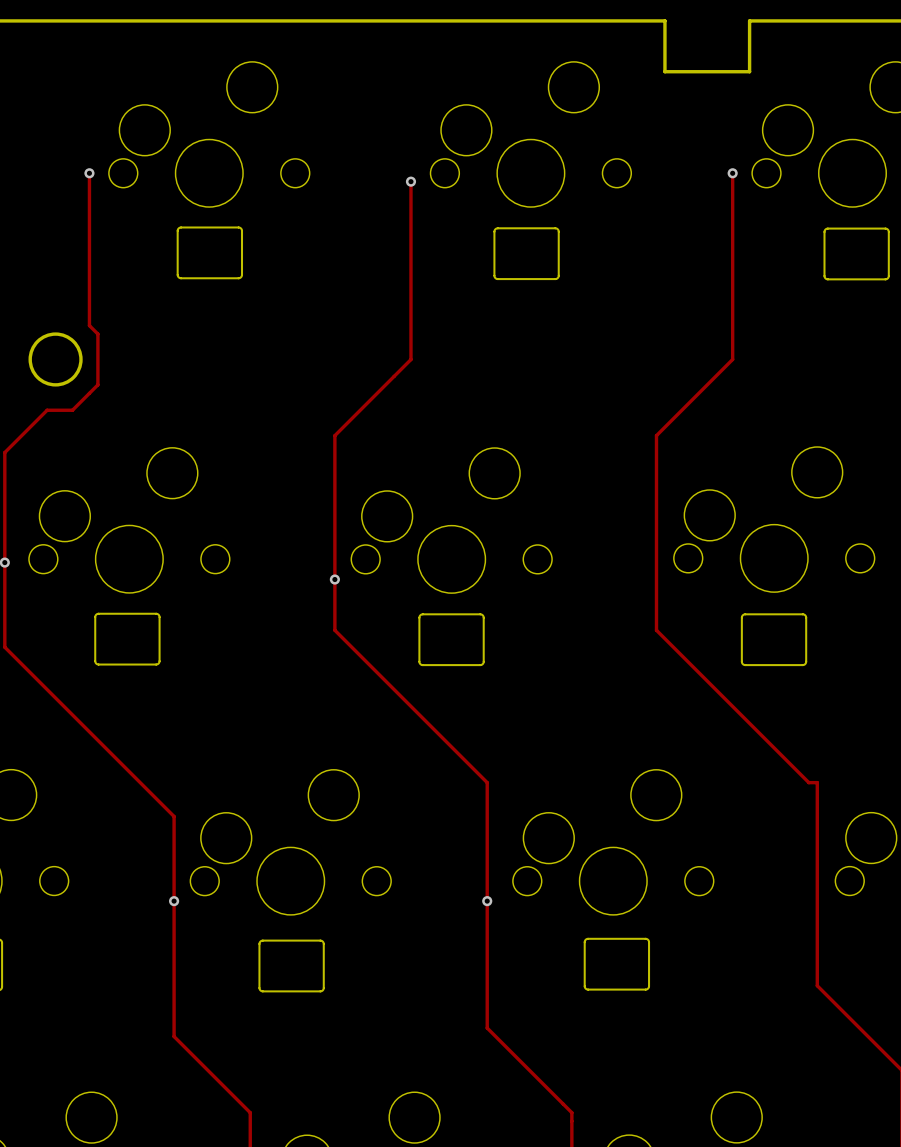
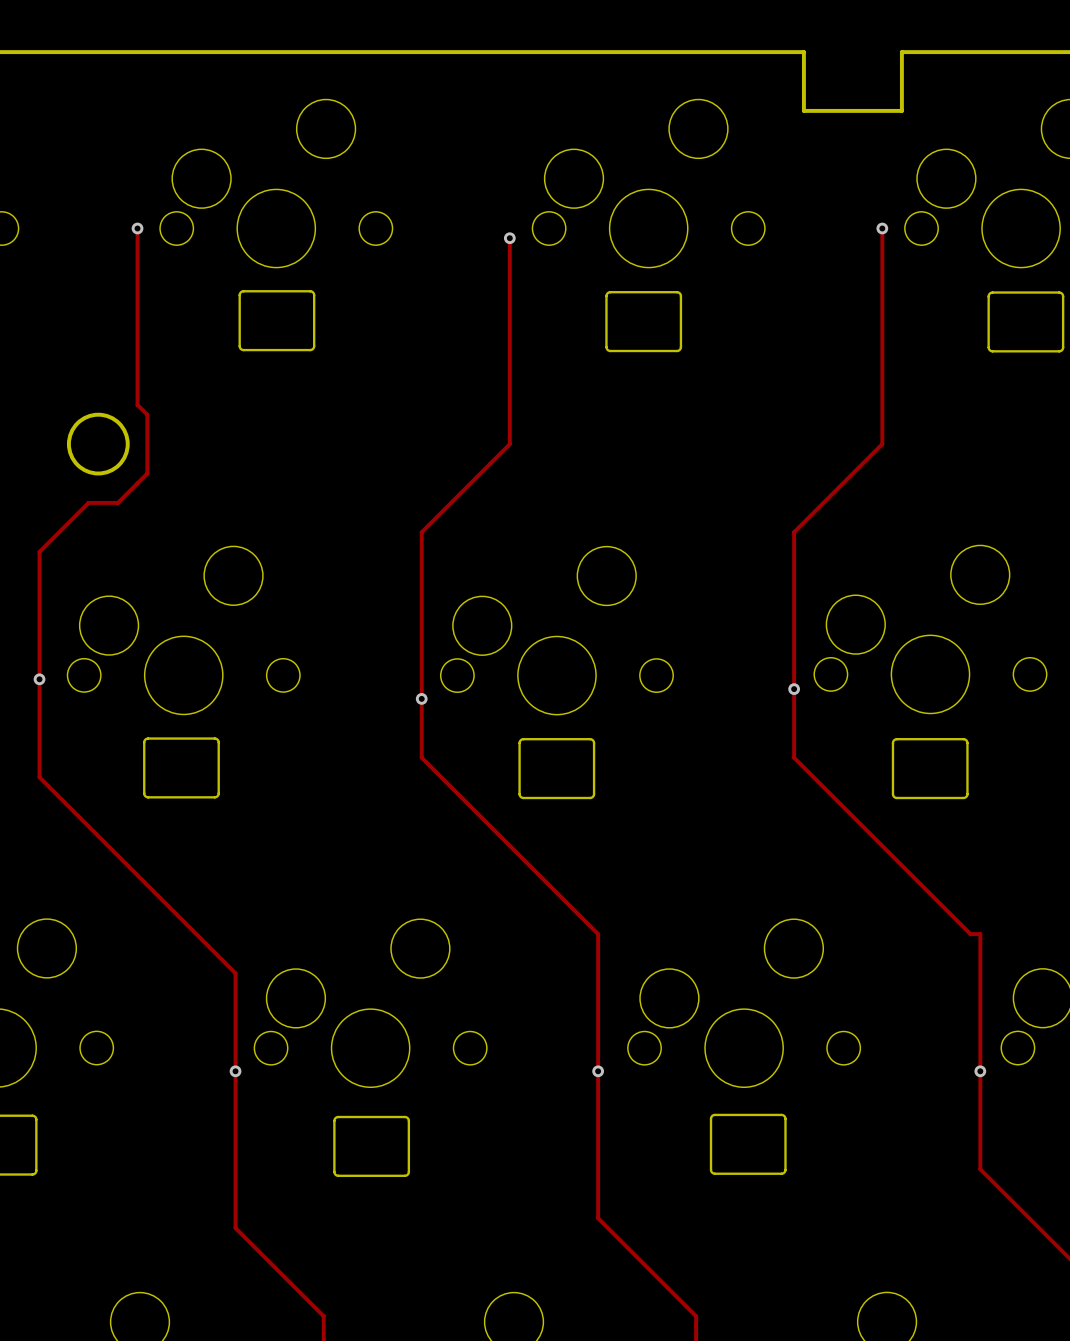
via: none -> (794, 689)
via: none -> (980, 1071)

